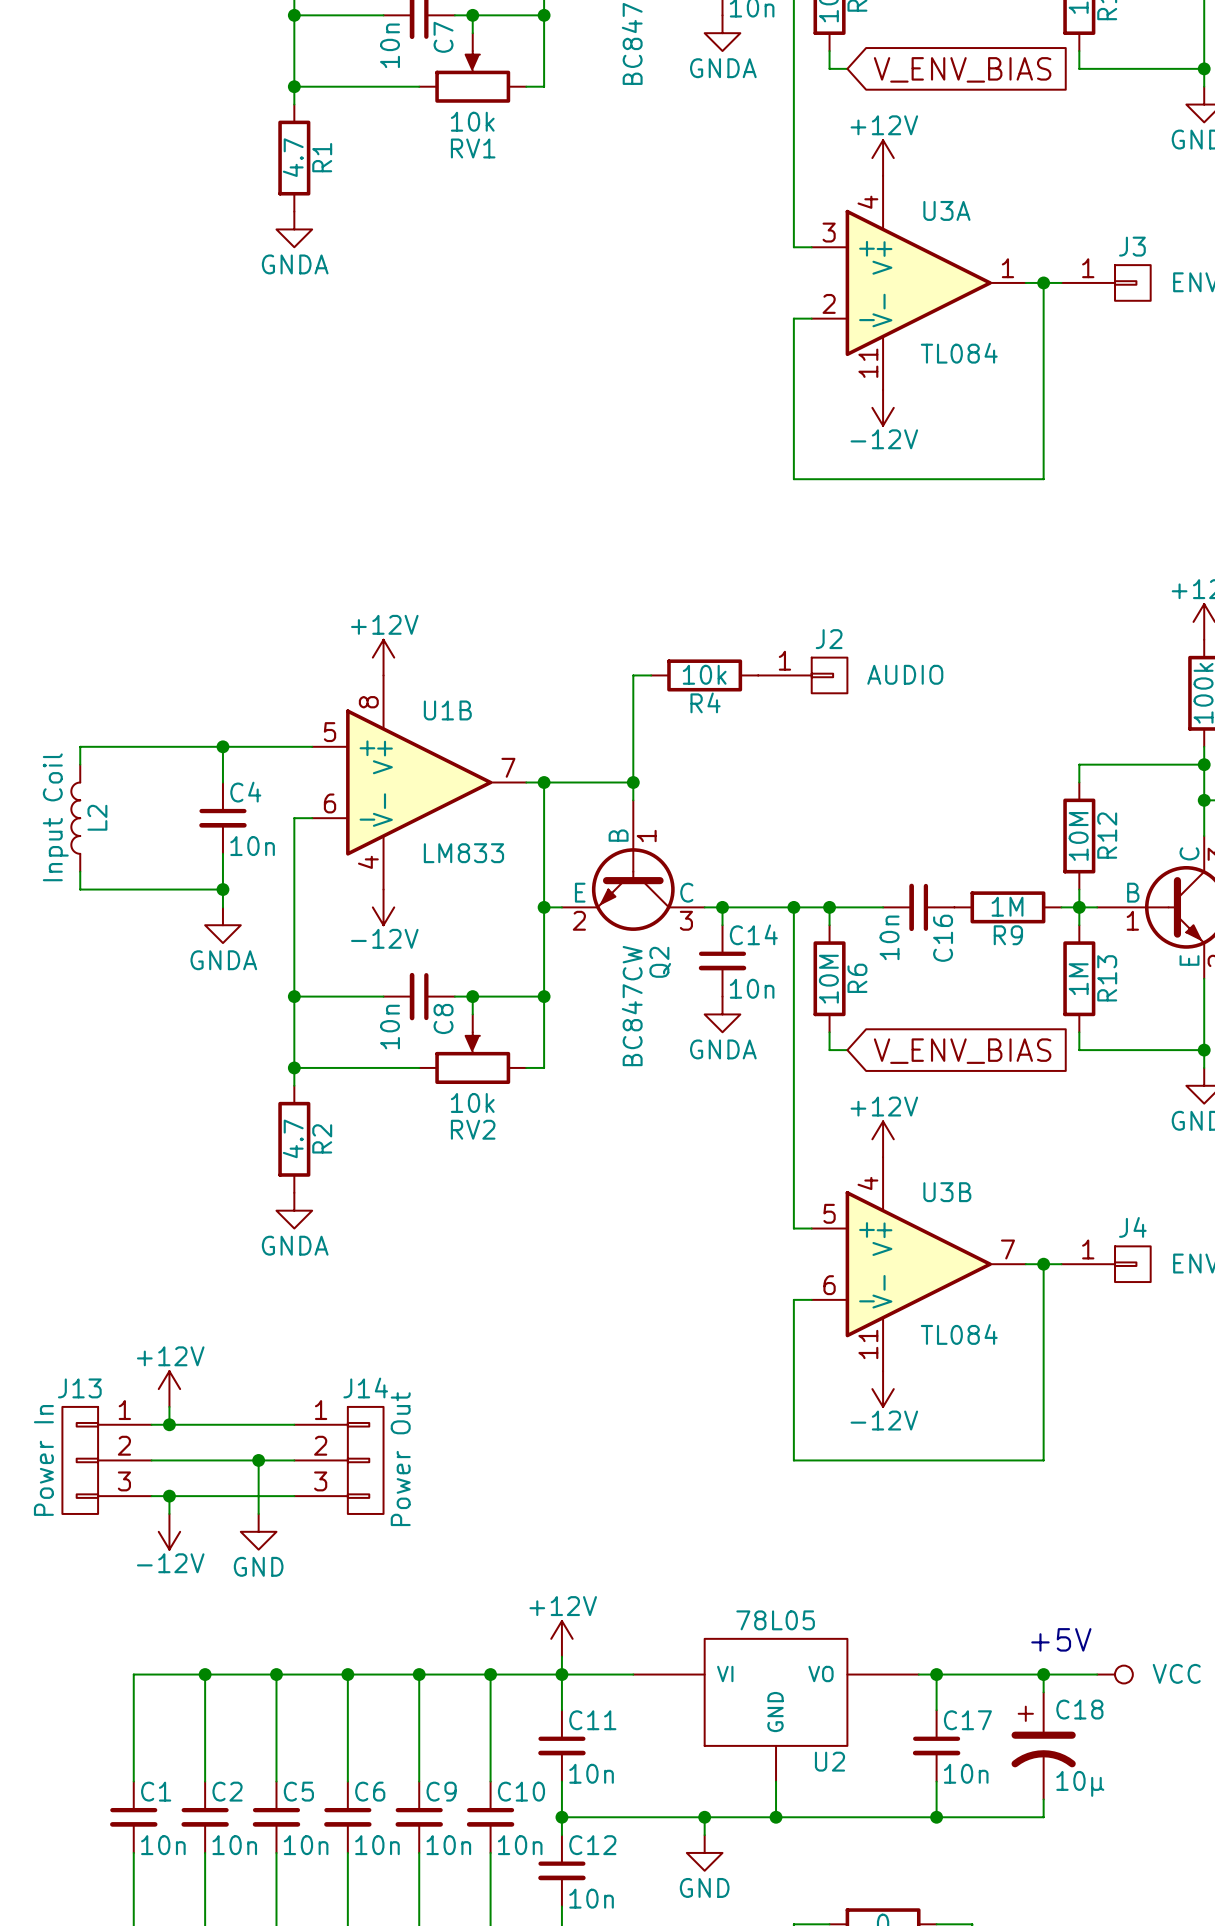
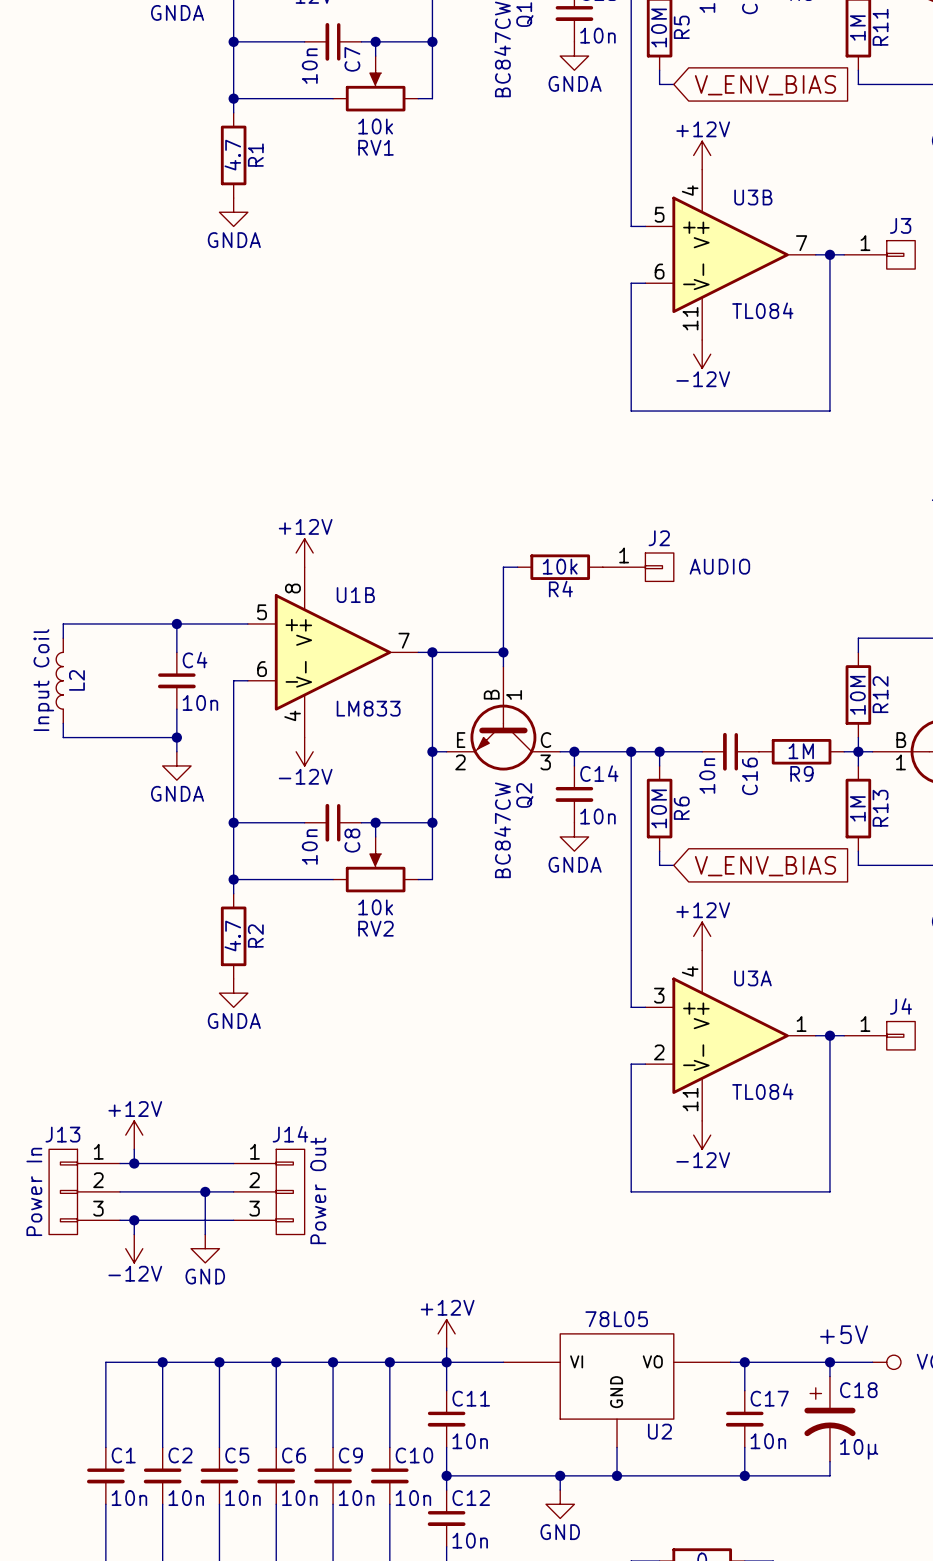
U3A position: (918, 282) -> (730, 1035)
U3B position: (918, 1264) -> (730, 254)

